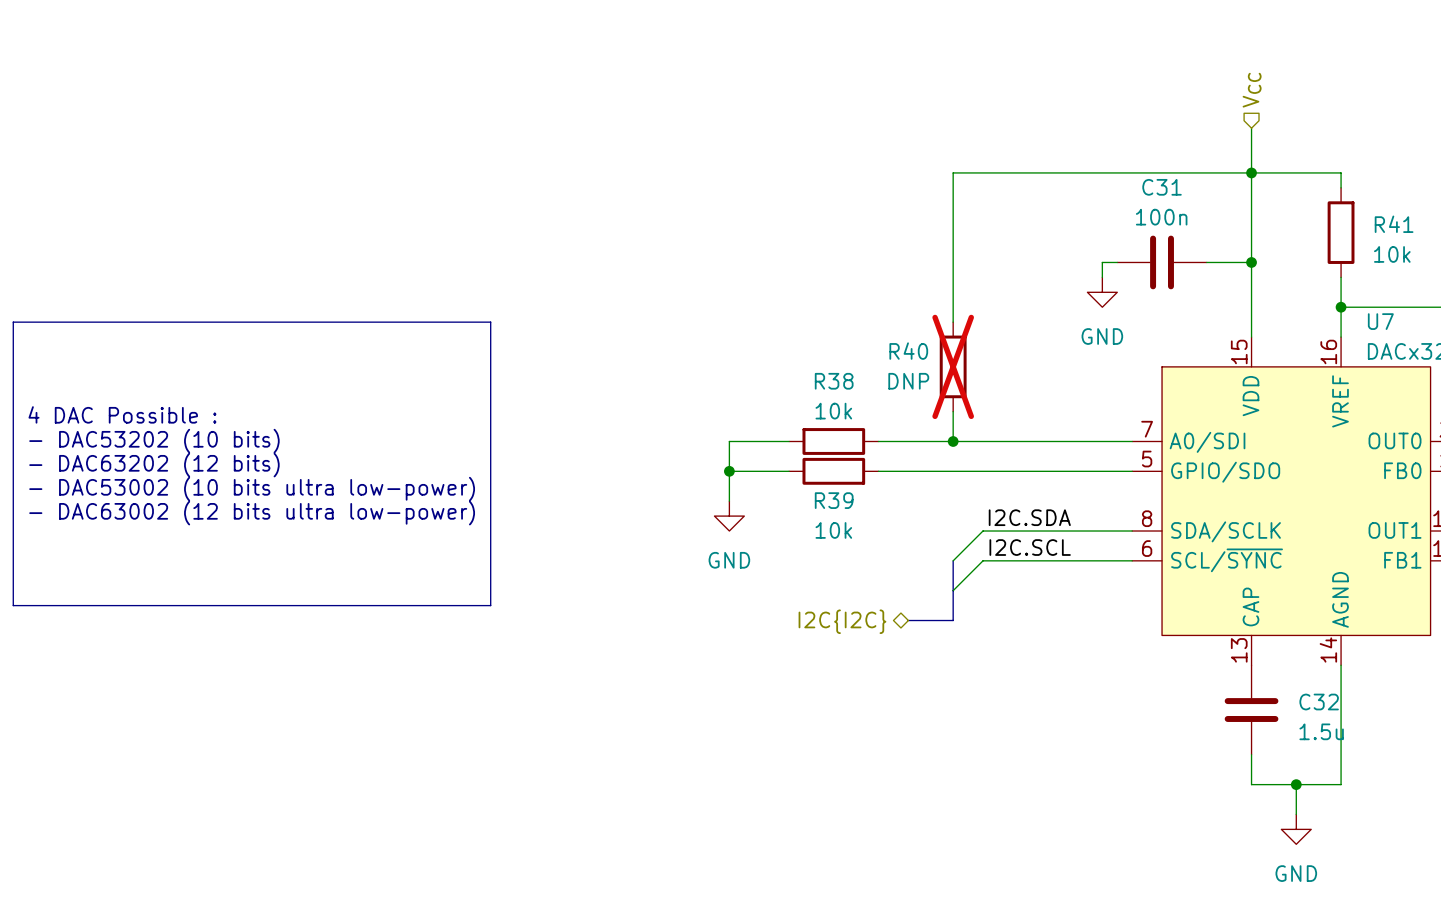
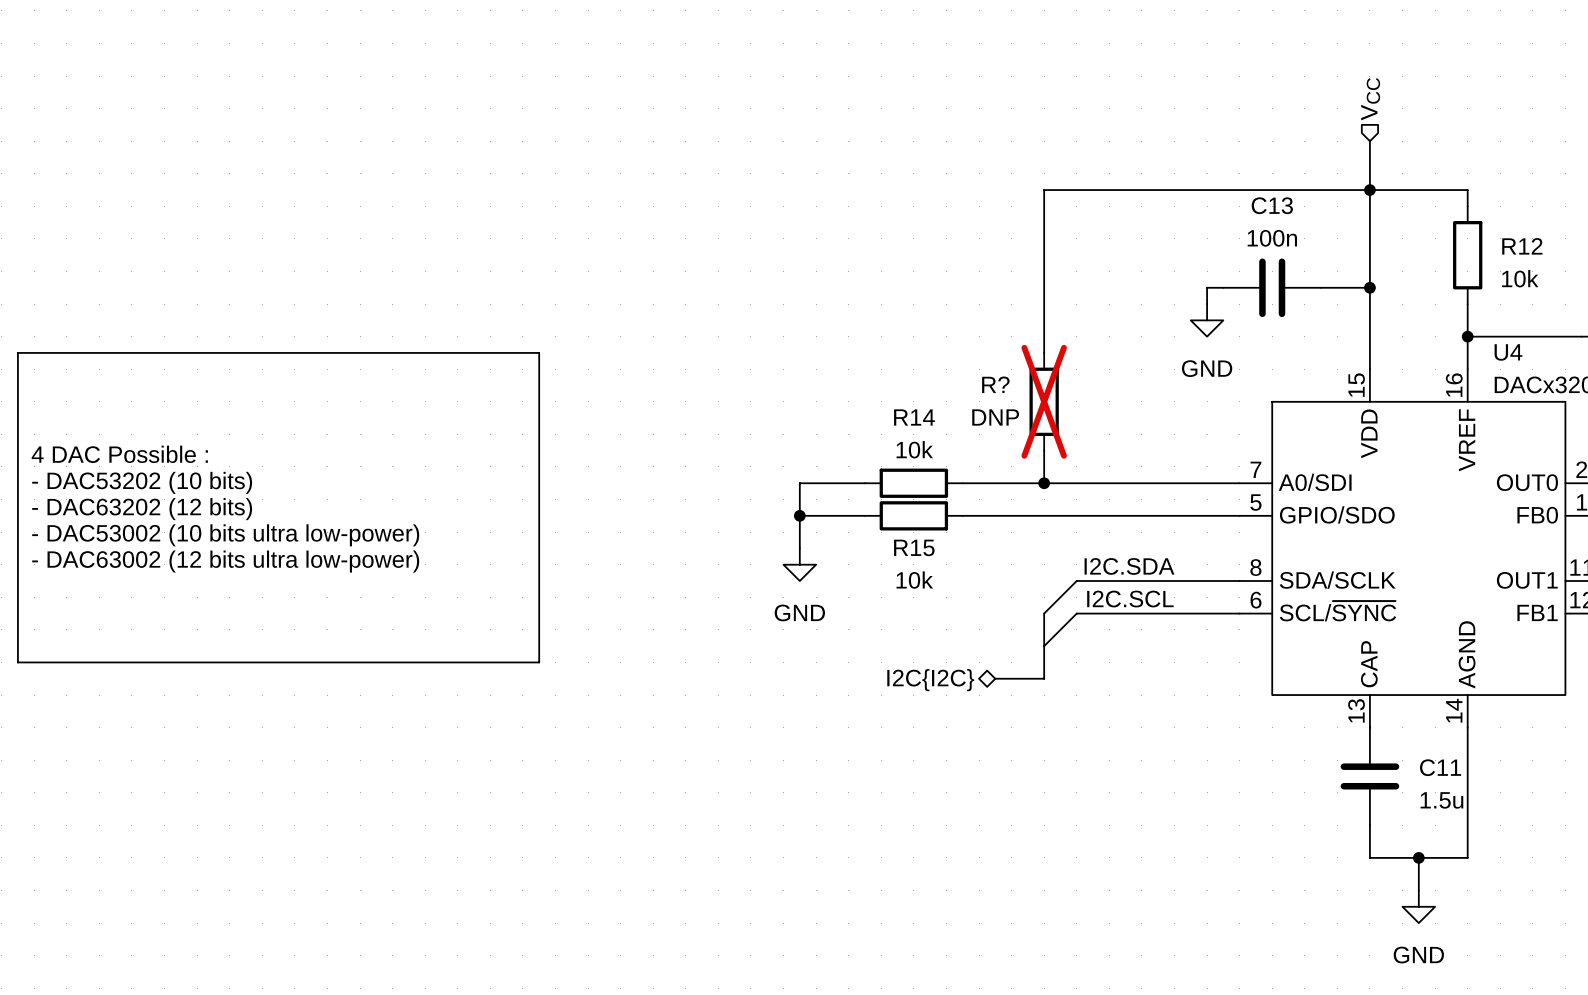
C31 name: C31 (1162, 187) -> C13 (1272, 205)
R41 name: R41 (1394, 224) -> R12 (1522, 246)
U7 name: U7 (1380, 321) -> U4 (1508, 352)
R40 name: R40 (908, 351) -> R? (995, 384)
R38 name: R38 (834, 381) -> R14 (914, 417)
R39 name: R39 (834, 500) -> R15 (914, 547)
C32 name: C32 (1319, 702) -> C11 (1440, 767)

